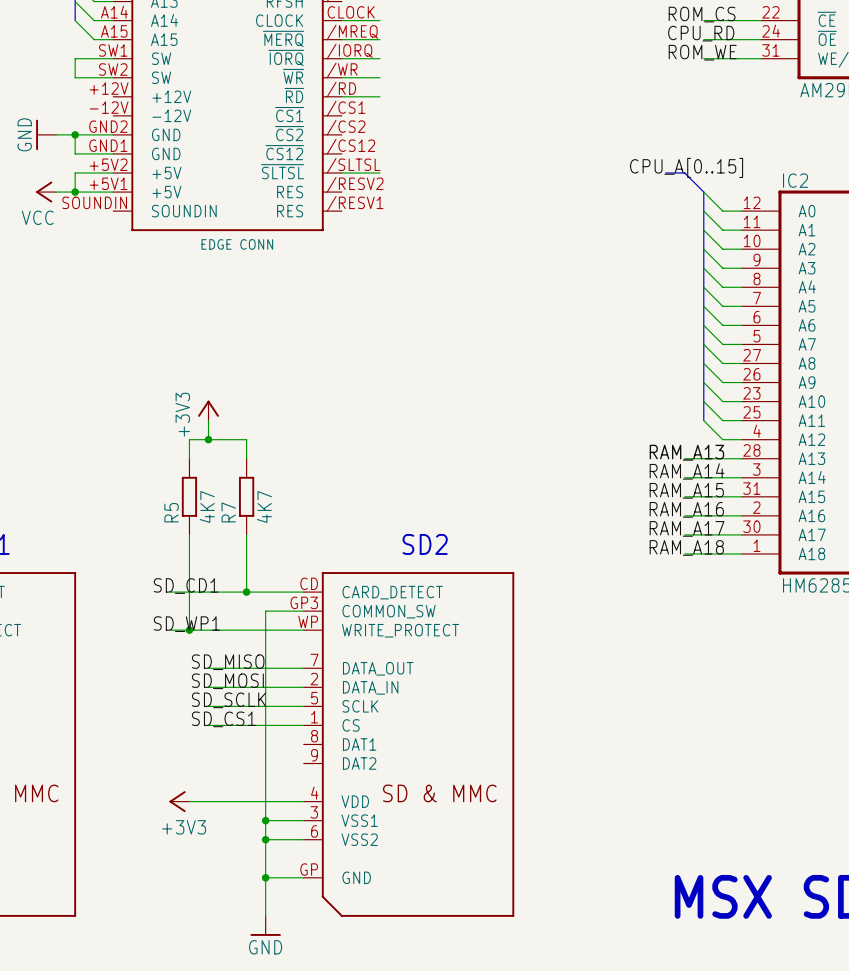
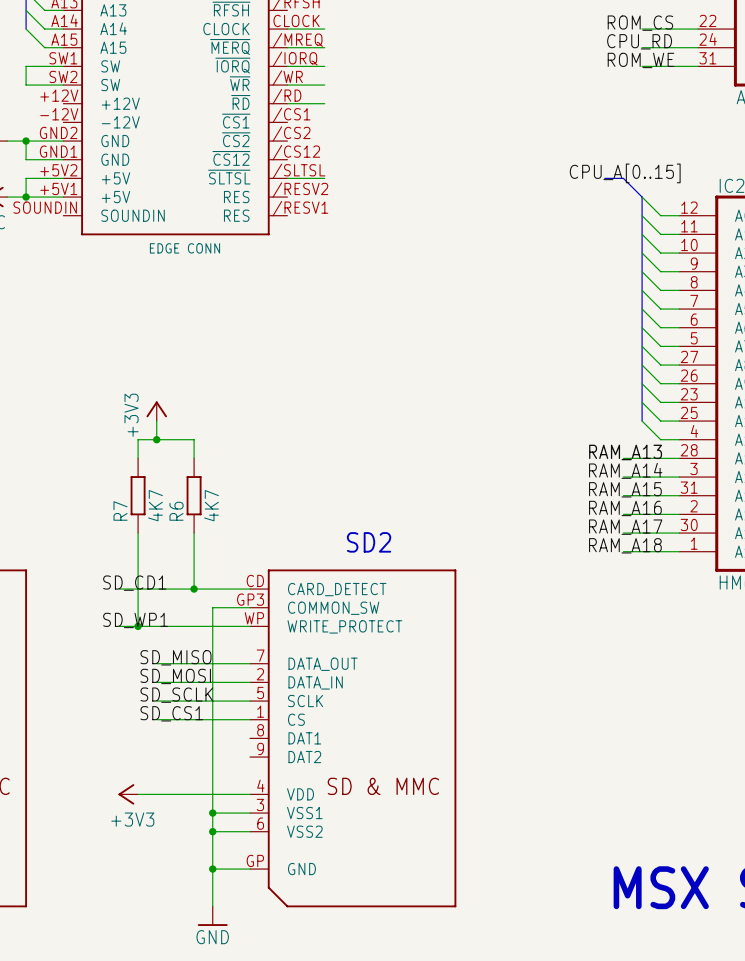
R5 name: R5 (171, 512) -> R7 (120, 510)
R7 name: R7 (228, 512) -> R6 (176, 511)

